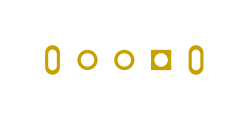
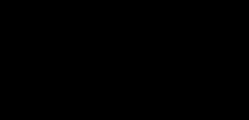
part: (124, 59) -> none

